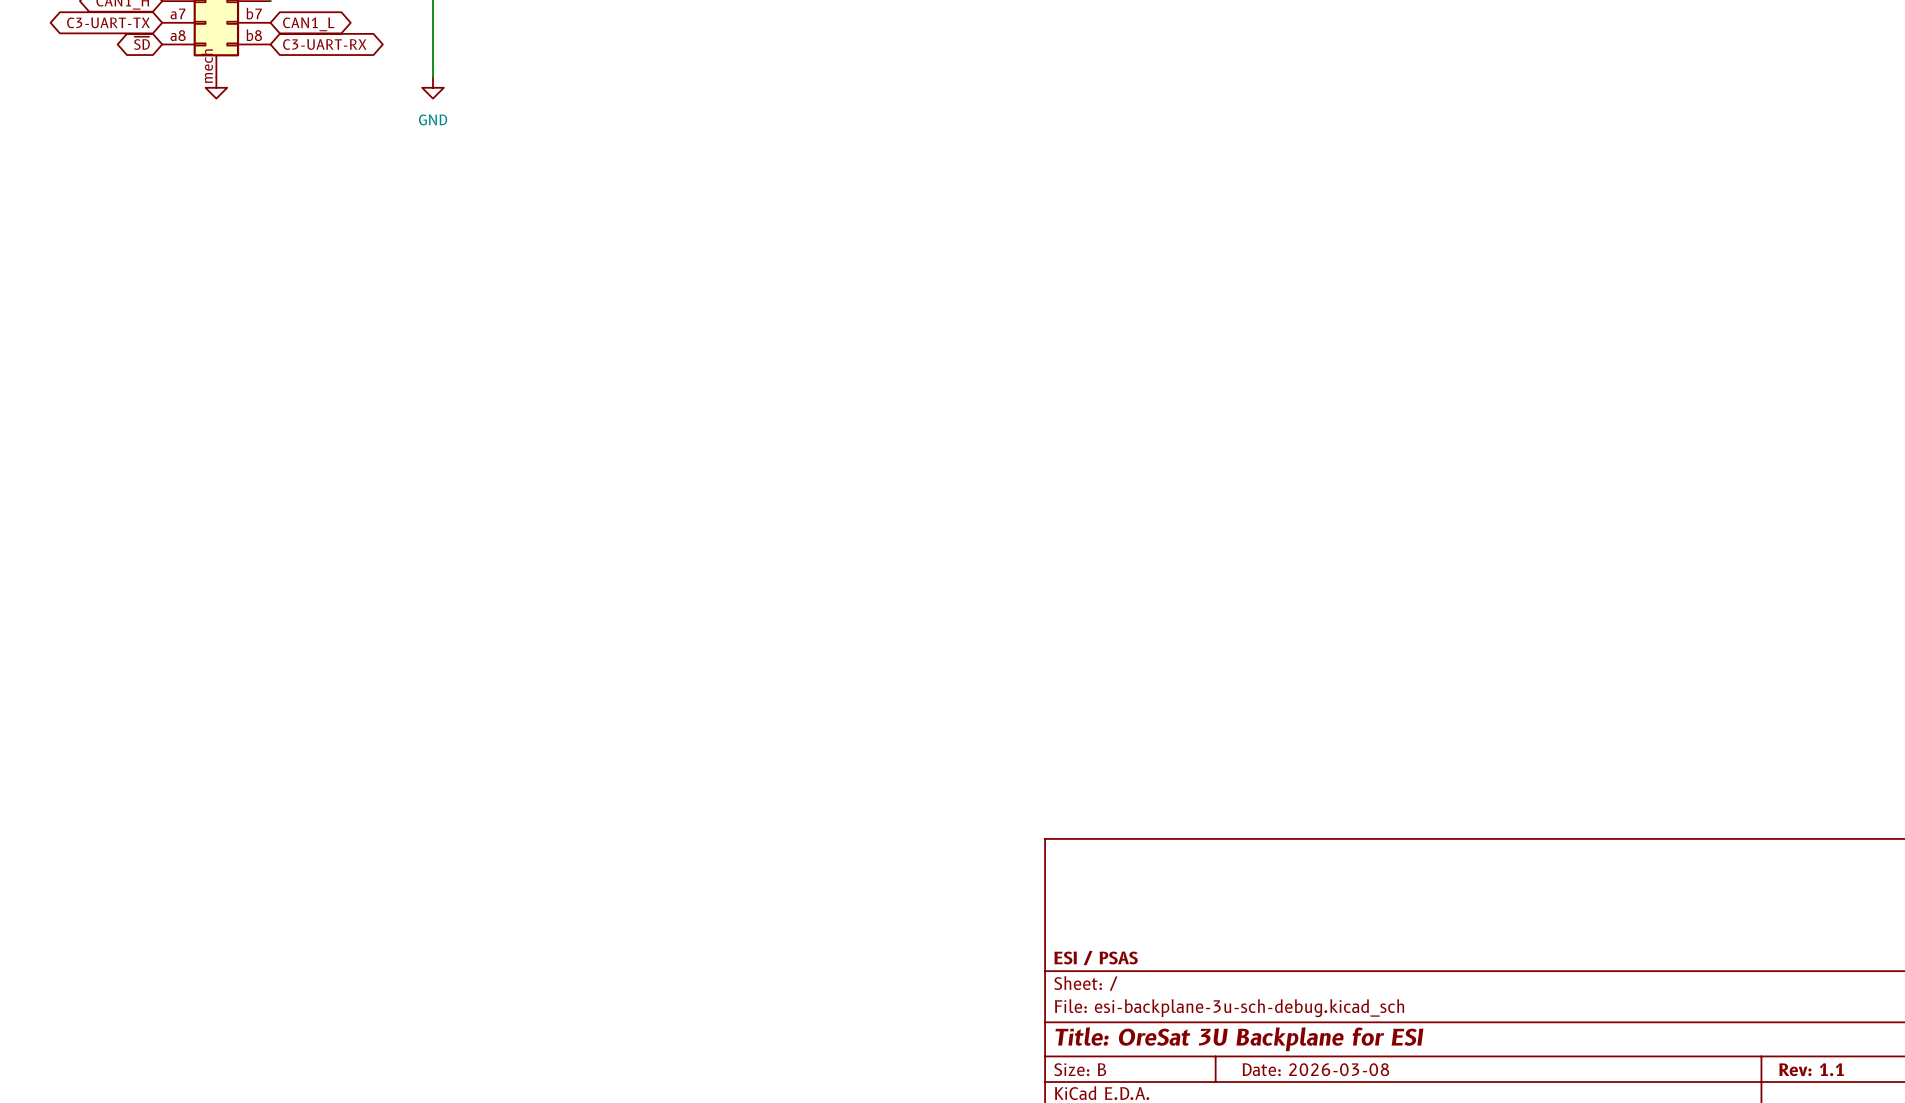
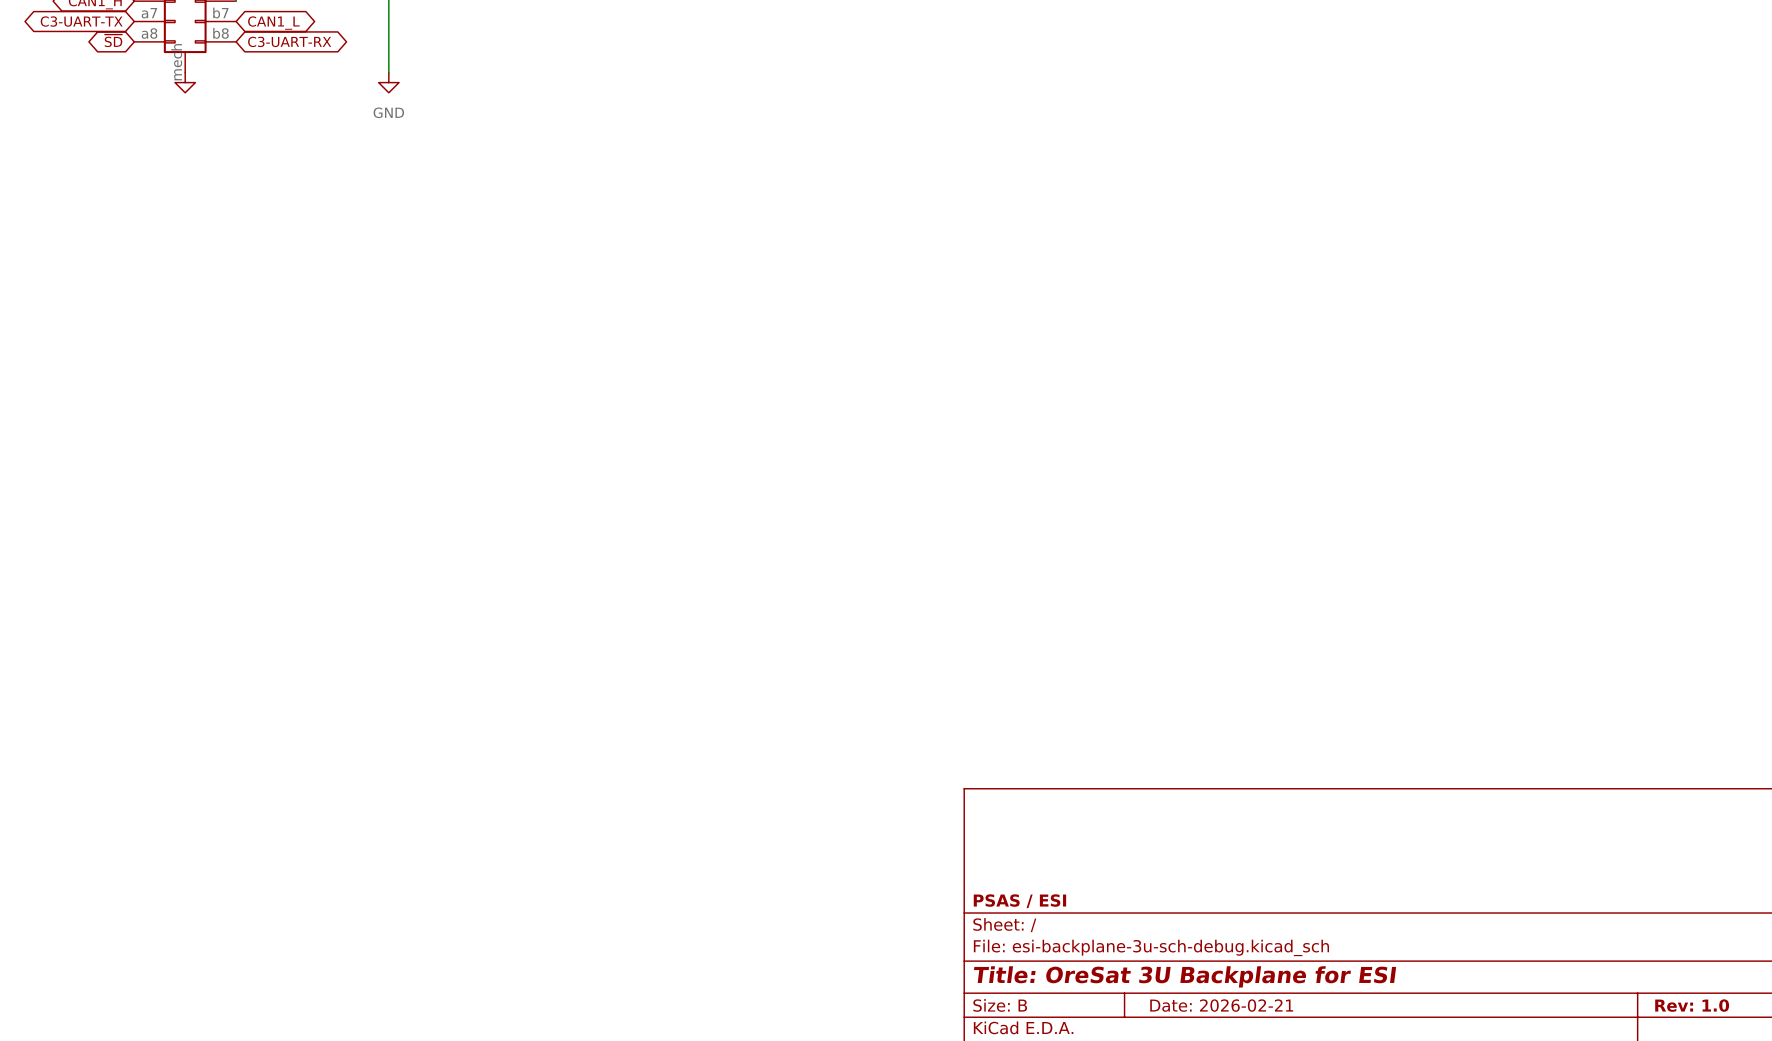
title block: ESI / PSAS (1096, 957) -> PSAS / ESI (1019, 901)
title block: Date: 2026-03-08 (1315, 1069) -> Date: 2026-02-21 (1221, 1005)
title block: Rev: 1.1 (1811, 1069) -> Rev: 1.0 (1692, 1005)

